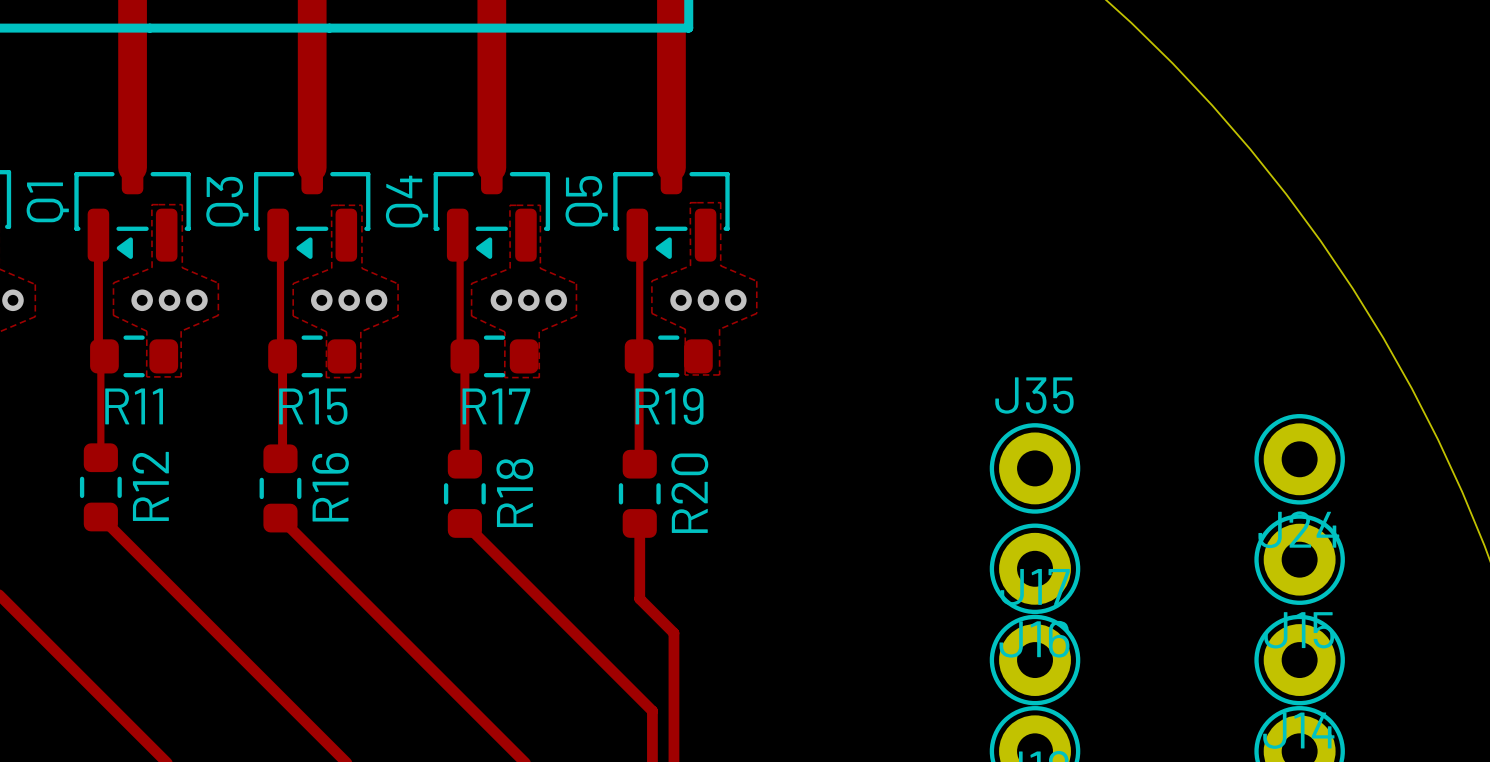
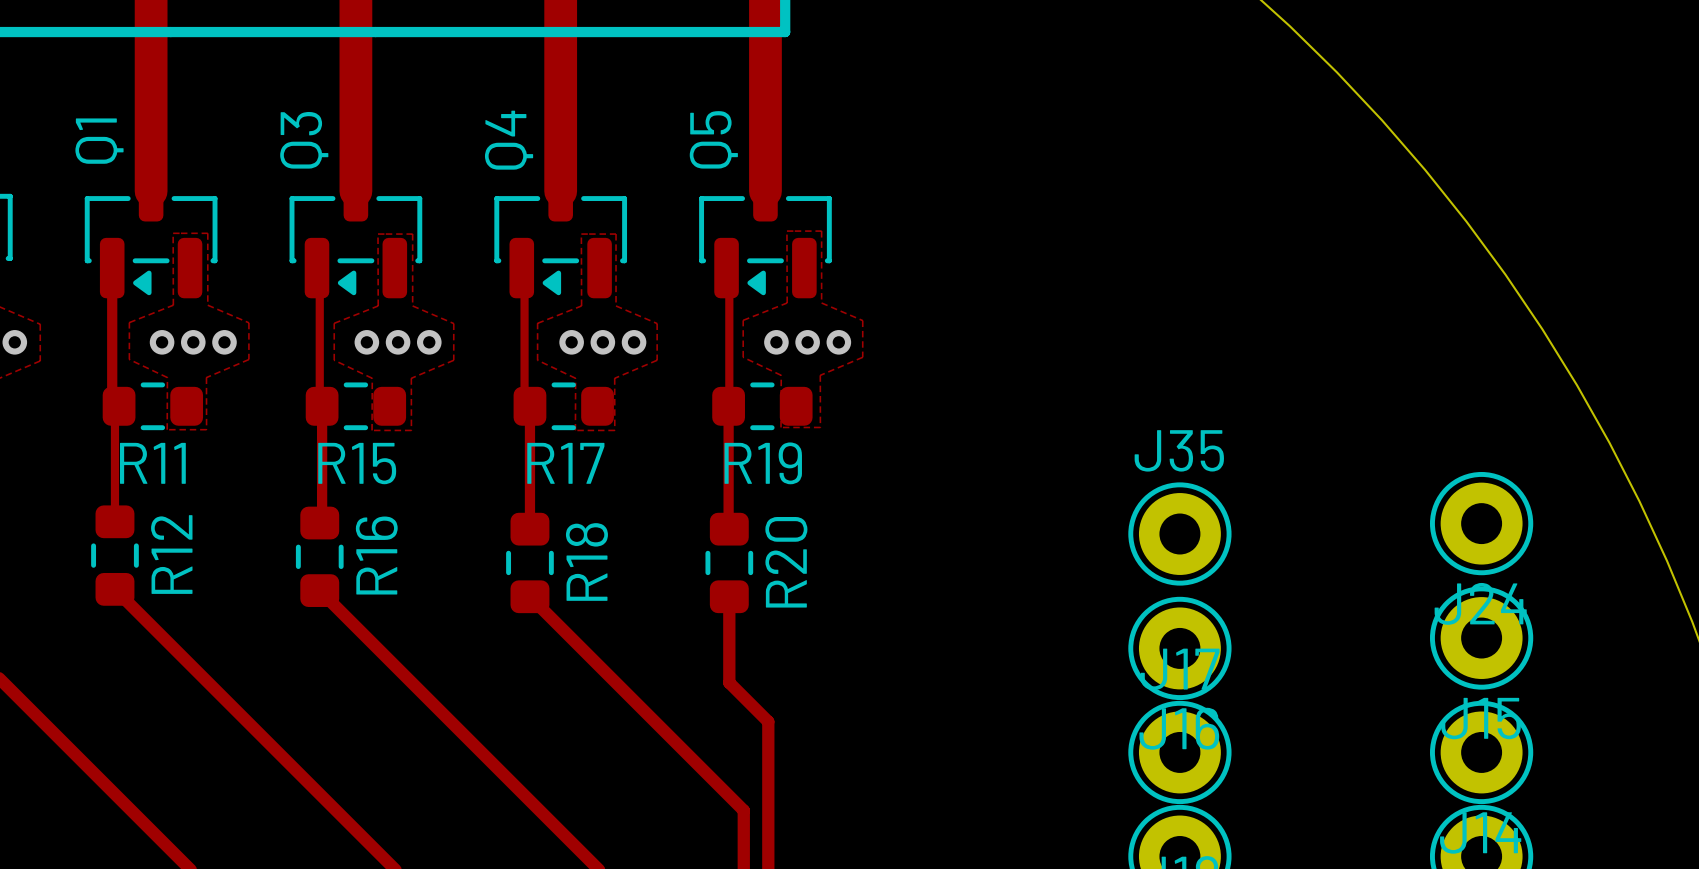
Q3 name position: Q3 (227, 201) -> Q3 (304, 140)
Q4 name position: Q4 (407, 201) -> Q4 (509, 140)
Q5 name position: Q5 (586, 201) -> Q5 (713, 139)
Q1 name position: Q1 (47, 202) -> Q1 (99, 141)

